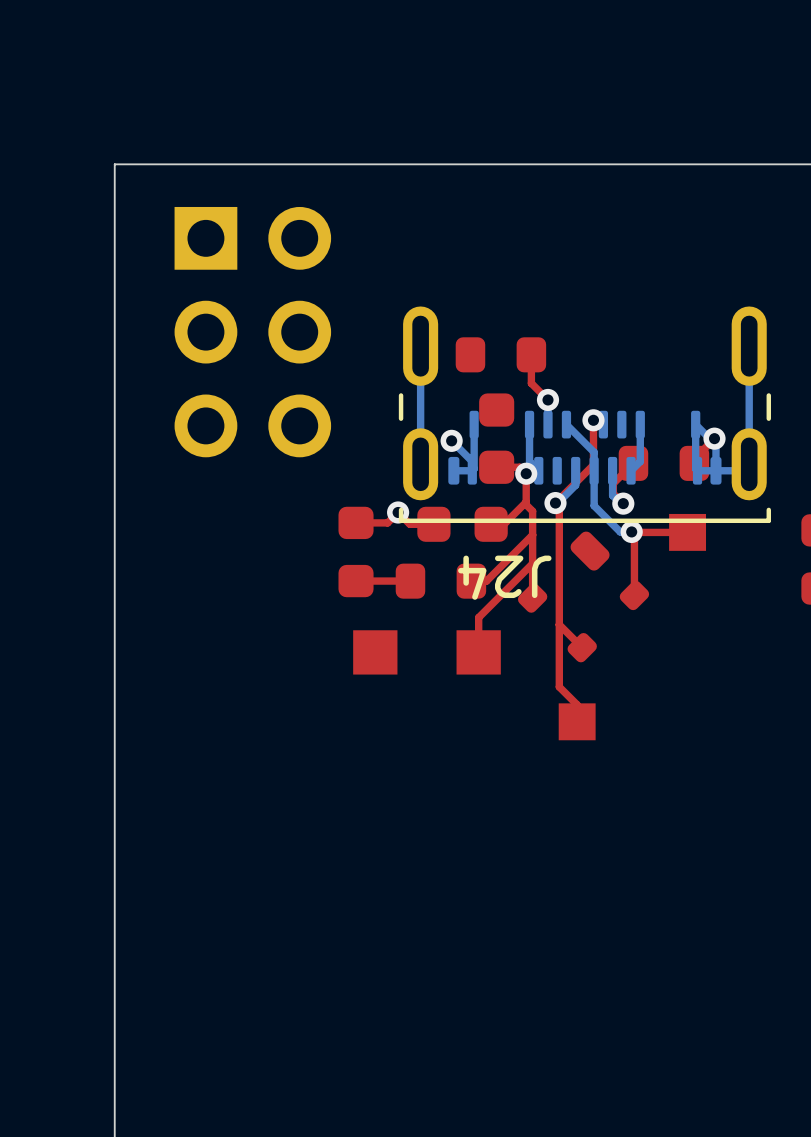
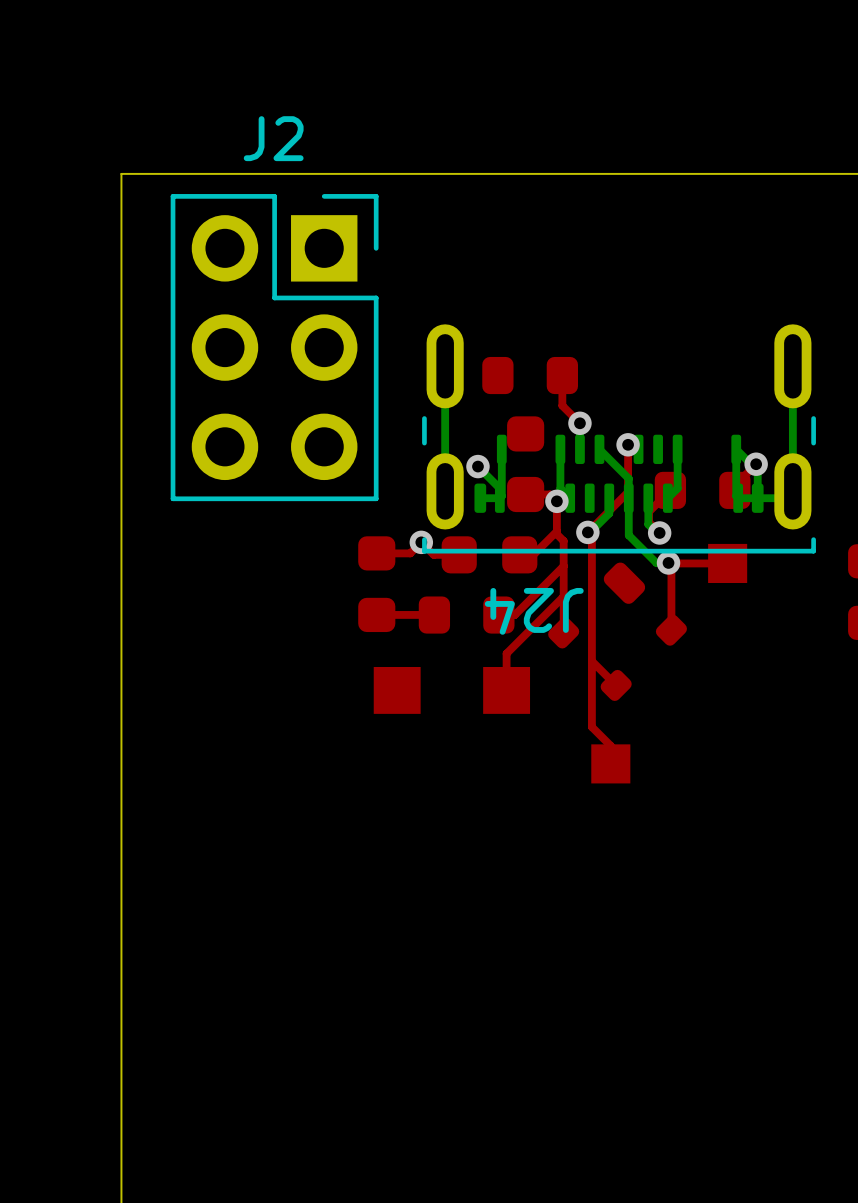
J2 side: top (252, 332) -> bottom (274, 347)

